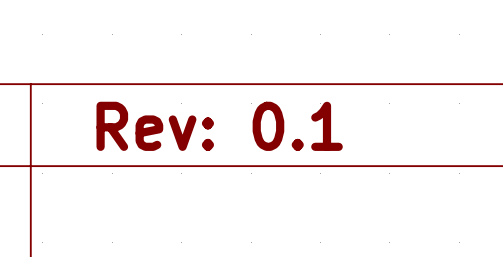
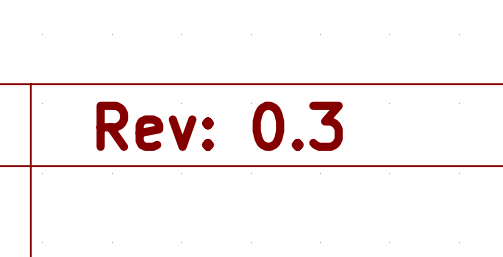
title block: Rev: 0.1 (219, 126) -> Rev: 0.3 (219, 126)

